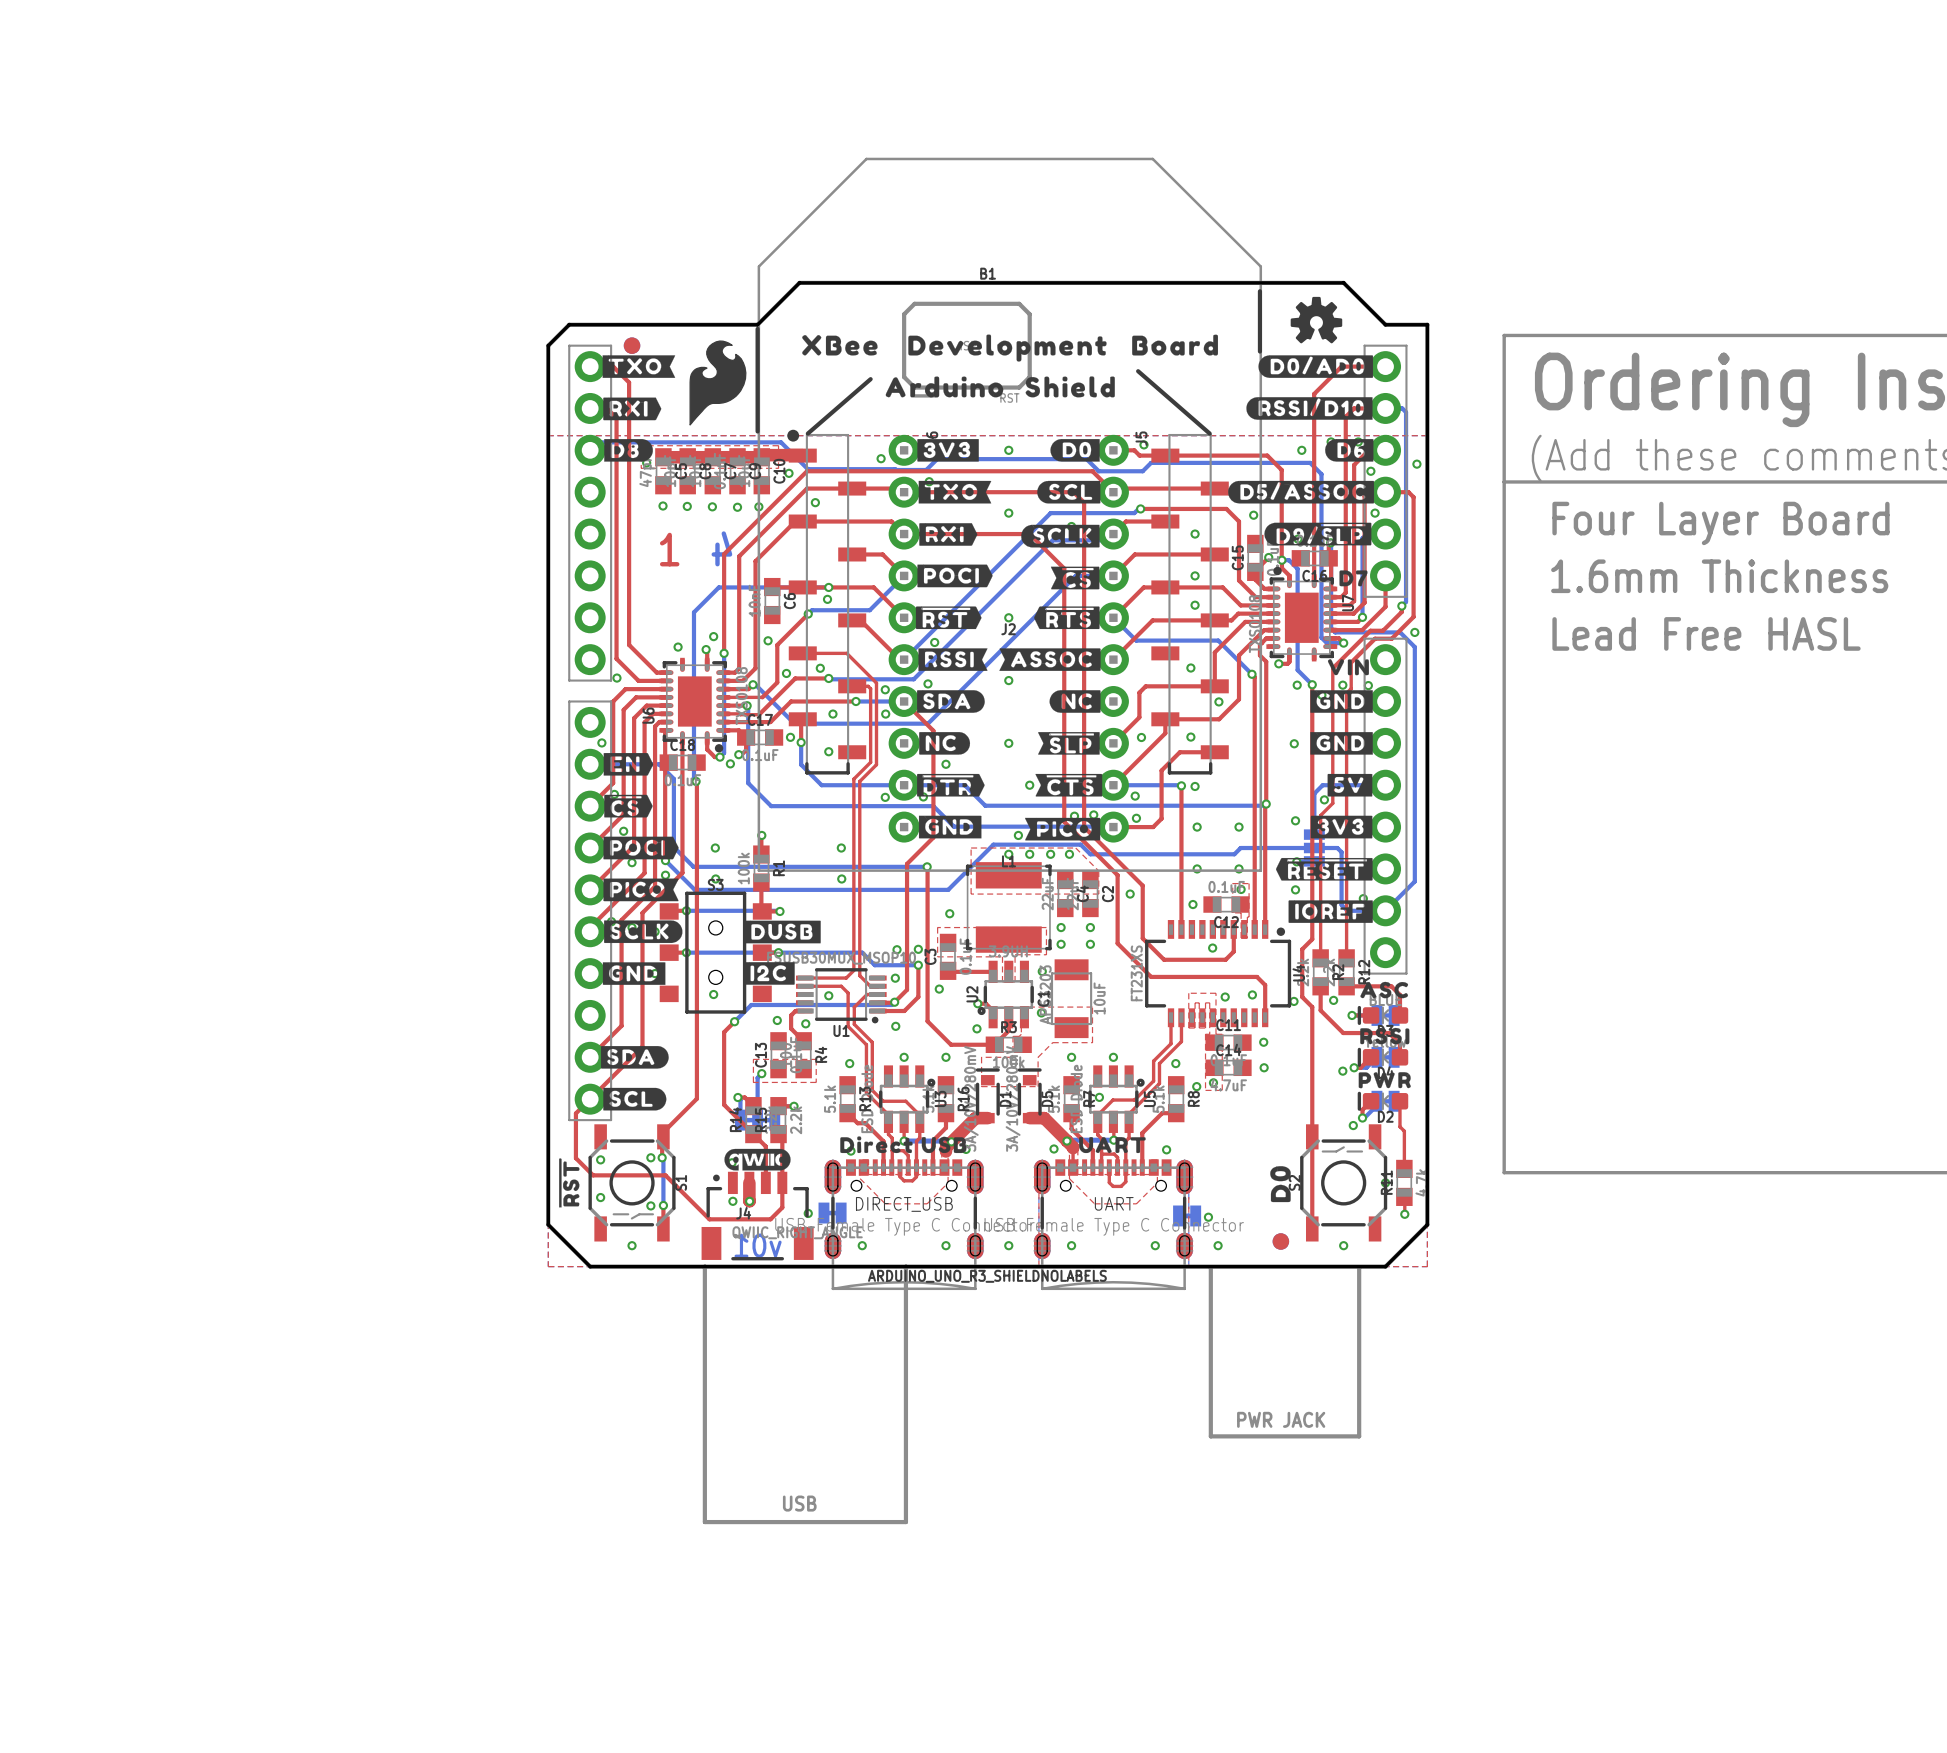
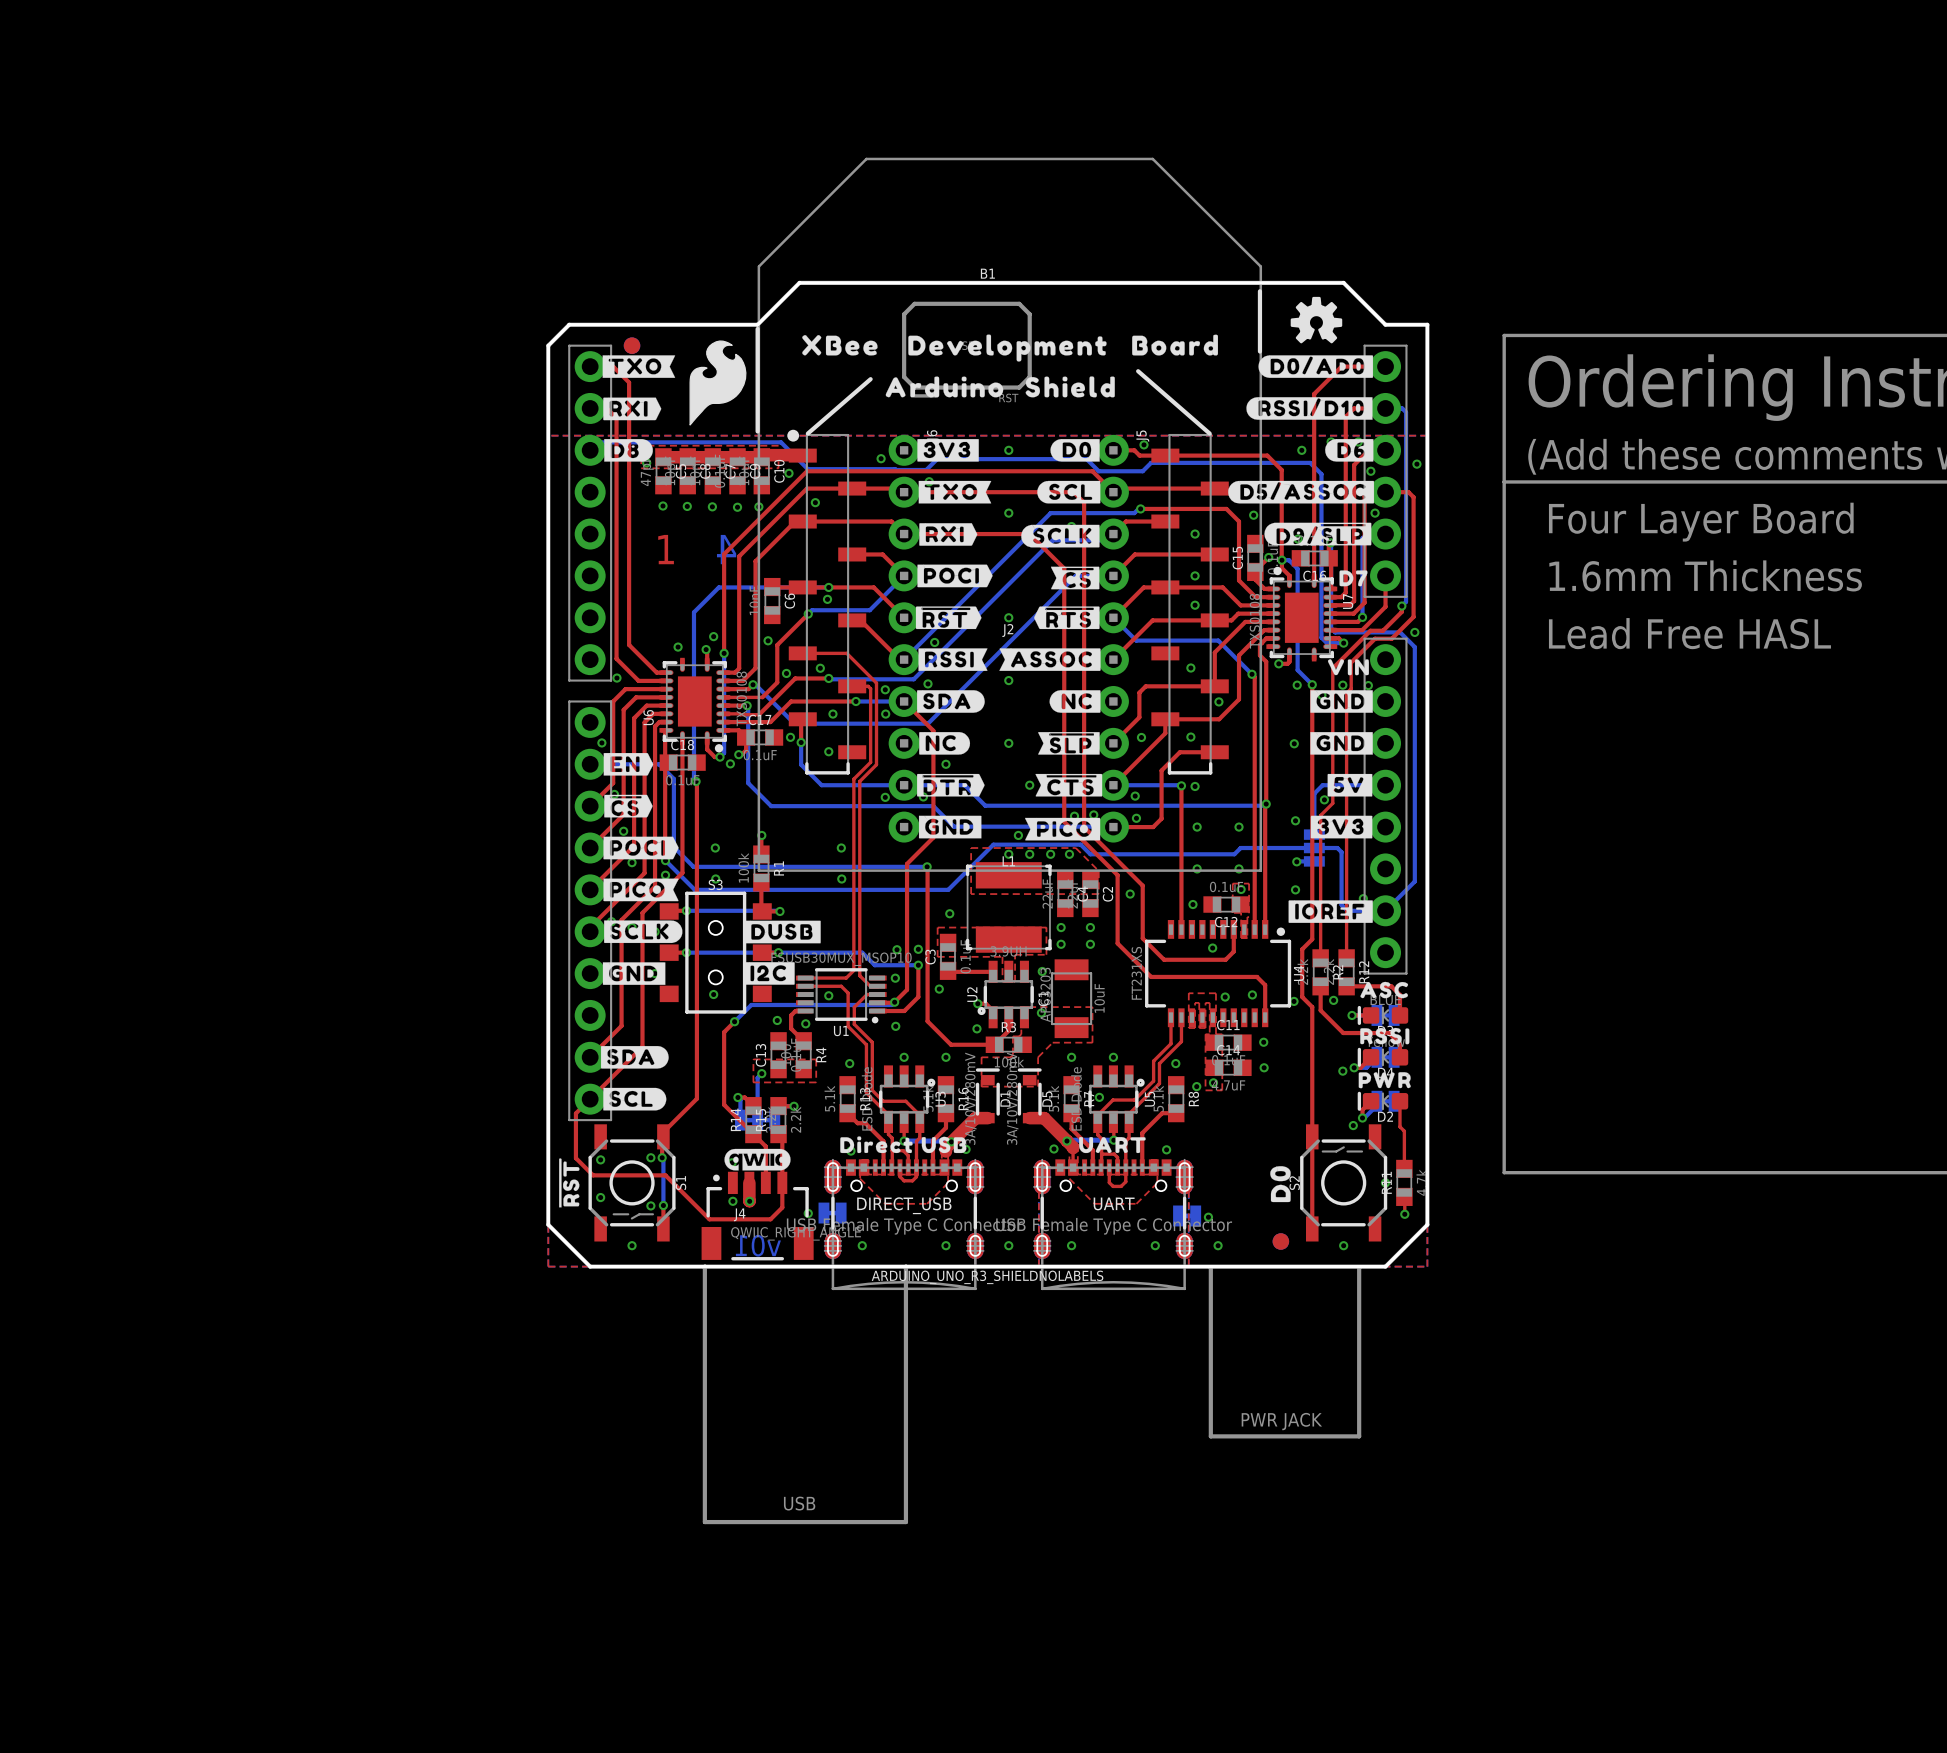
drawing: [1276, 857, 1373, 881] -> none

